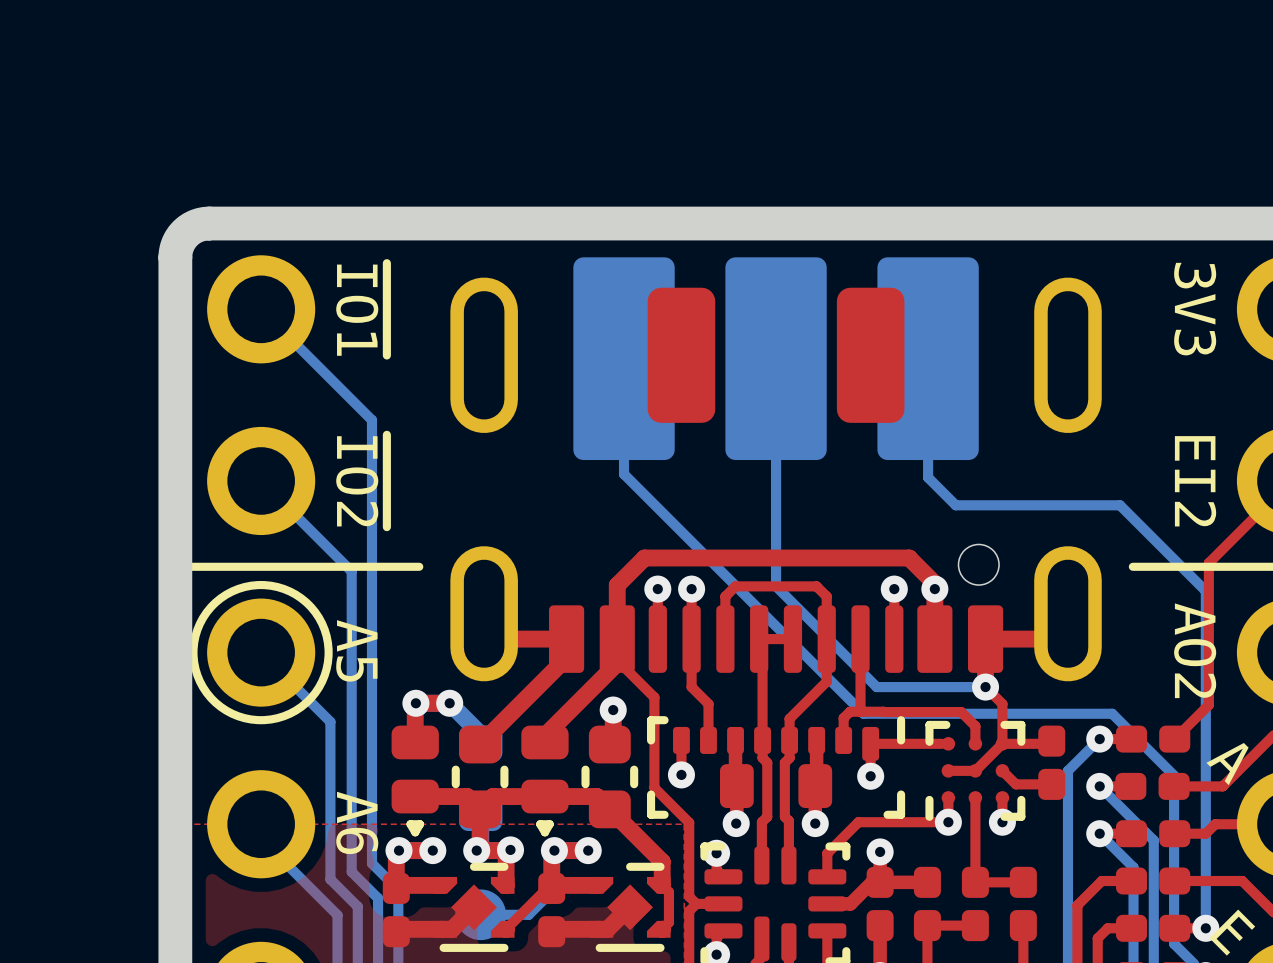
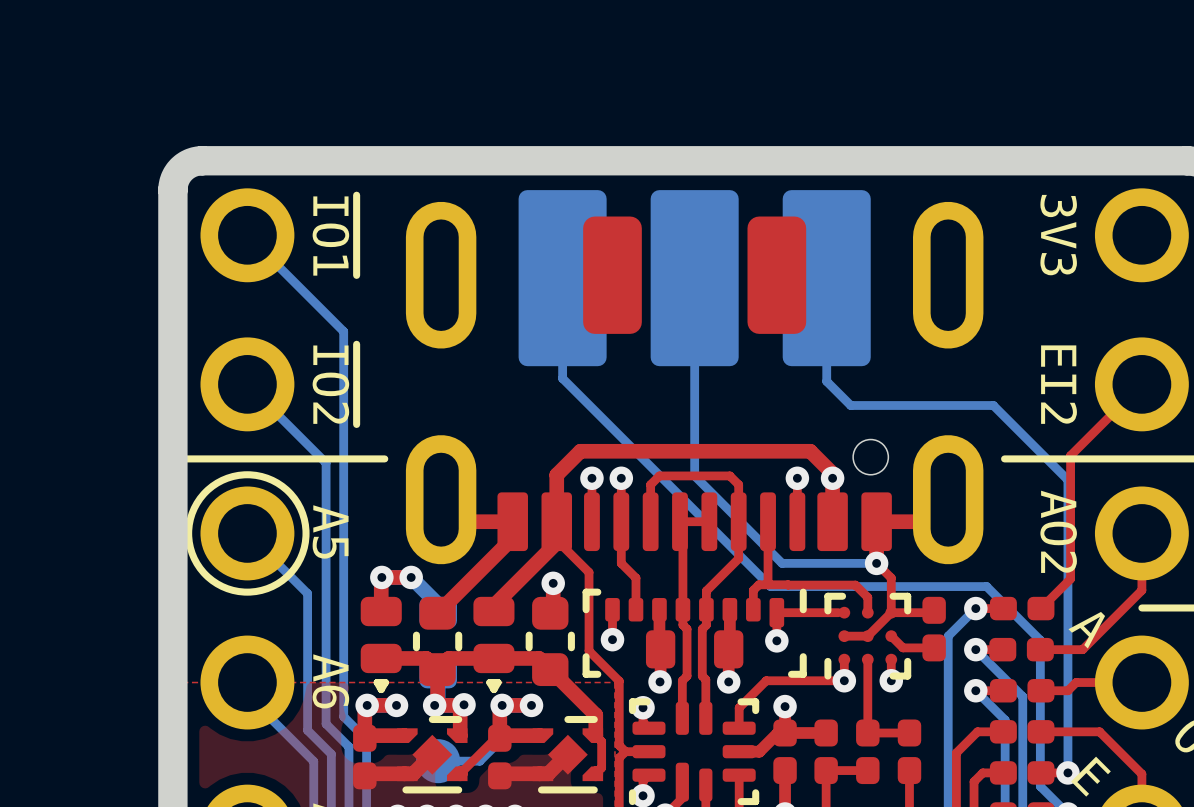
part footprint: [450, 277, 1102, 682] -> [405, 201, 984, 565]

